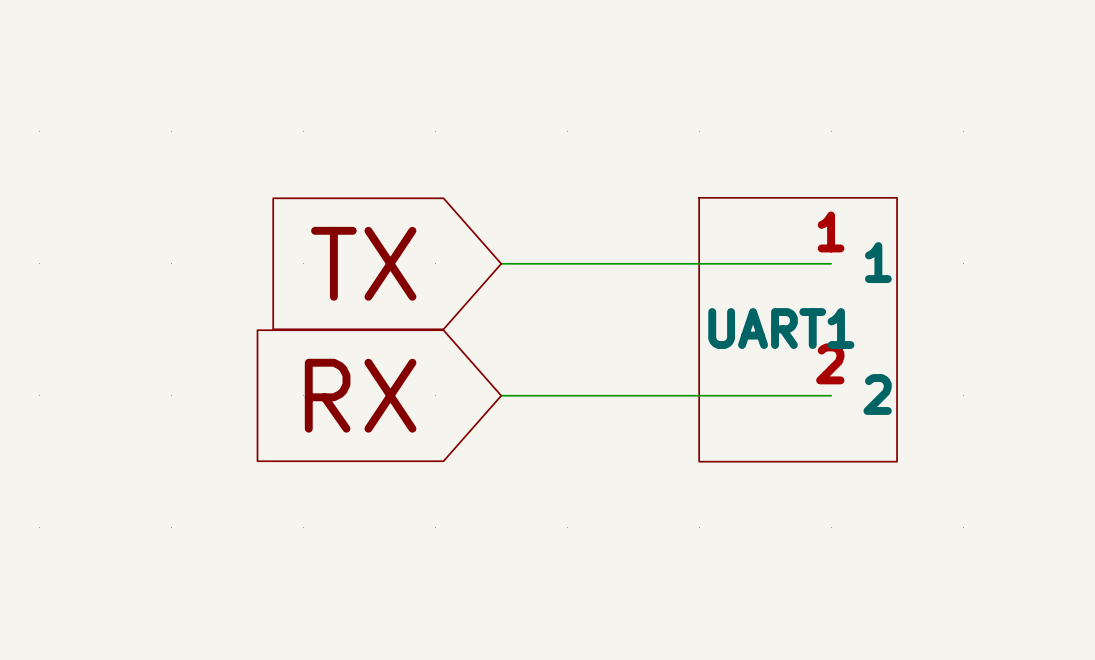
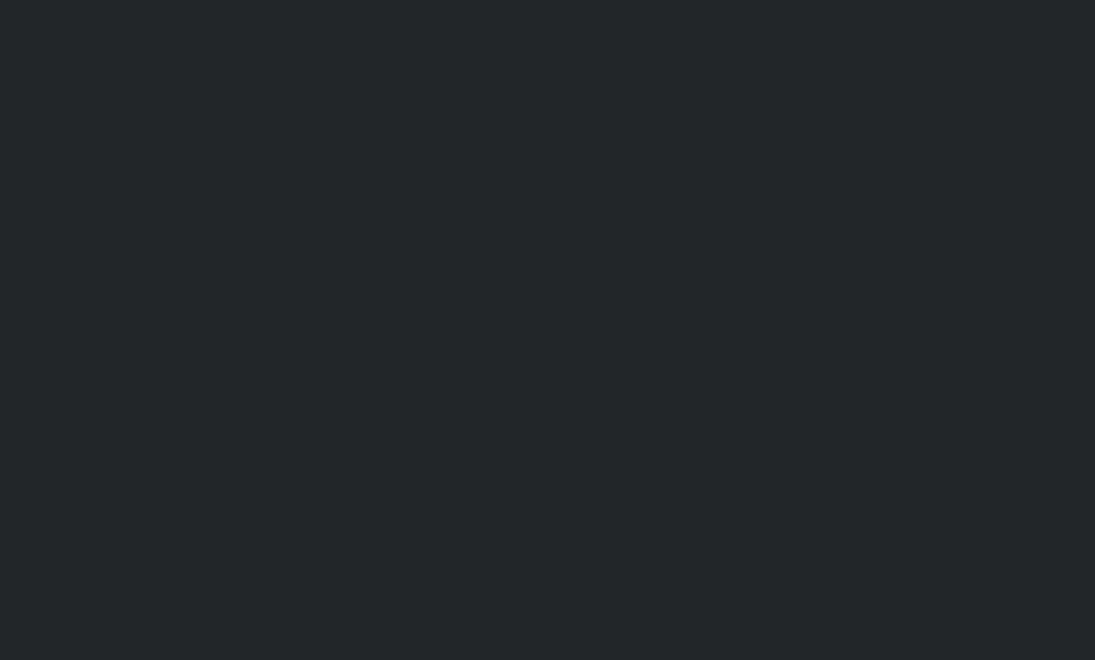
global label: TX (363, 263) -> none
wire: (501, 263) (831, 263) -> none
UART1: (798, 329) -> none
global label: RX (360, 395) -> none
wire: (501, 395) (831, 395) -> none

